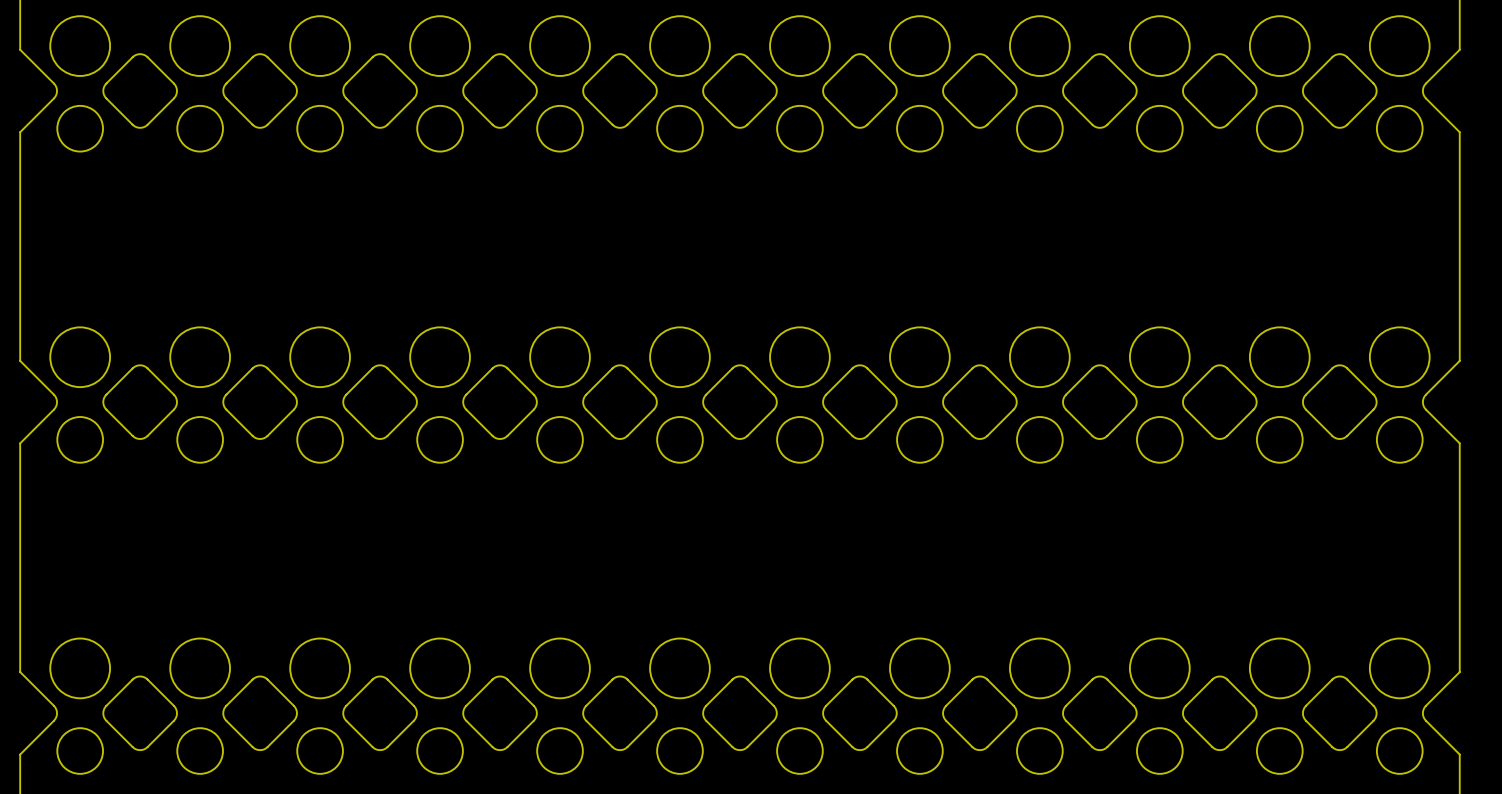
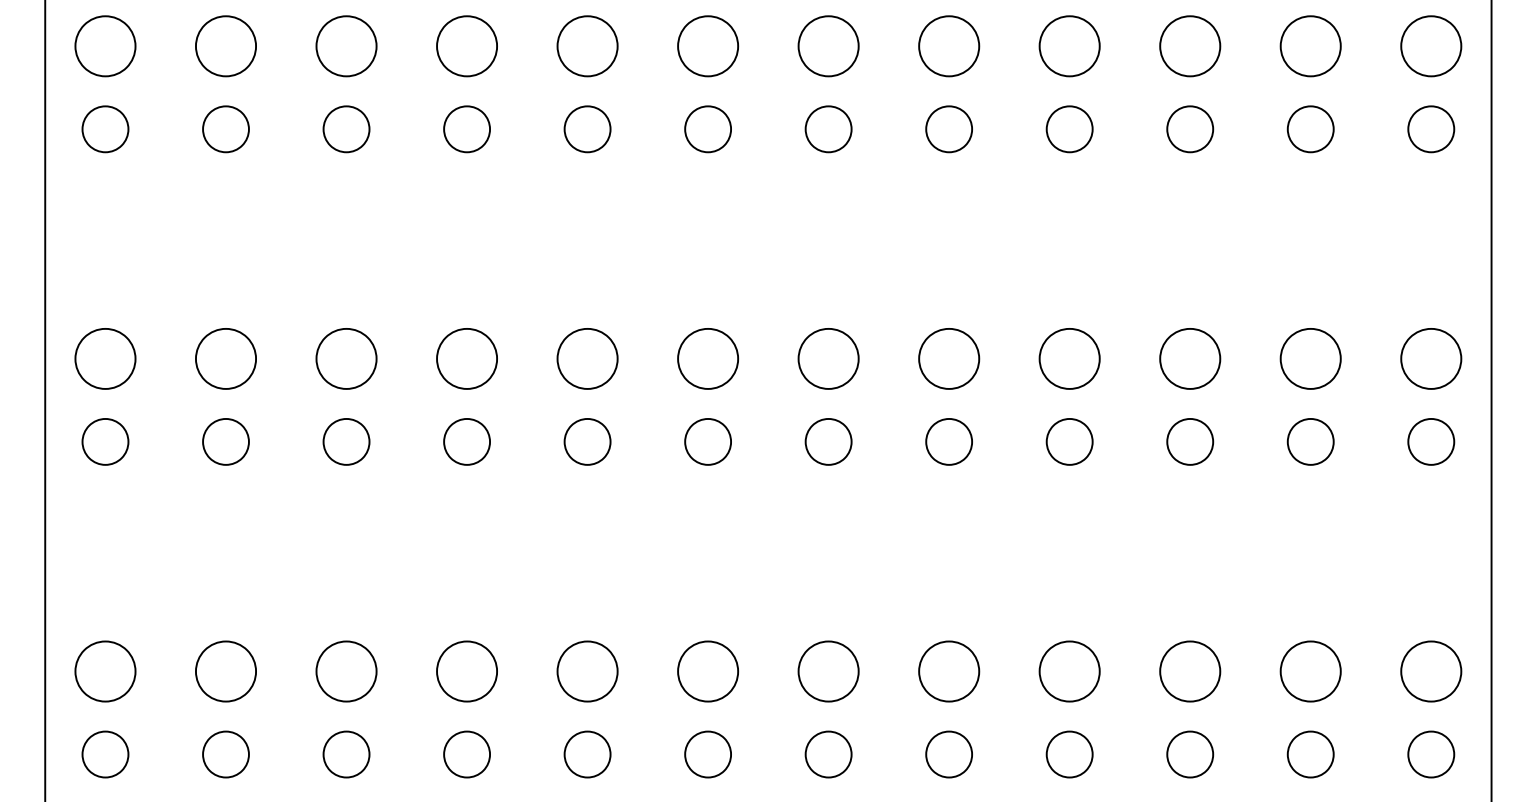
board edge: (20, 49) (53, 83) (57, 90) (53, 98) (20, 132) -> (45, 49) (45, 132)
board edge: (1459, 49) (1426, 83) (1422, 90) (1426, 98) (1459, 132) -> (1491, 49) (1491, 132)
board edge: (147, 57) (174, 84) (176, 92) (173, 98) (147, 124) (138, 127) (132, 124) (106, 98) (103, 89) (106, 83) (133, 56) (141, 54) (147, 57) -> none
board edge: (267, 57) (294, 84) (296, 92) (293, 98) (267, 124) (258, 127) (252, 124) (226, 98) (223, 89) (226, 83) (253, 56) (261, 54) (267, 57) -> none
board edge: (387, 57) (414, 84) (416, 92) (413, 98) (387, 124) (378, 127) (372, 124) (346, 98) (343, 89) (346, 83) (373, 56) (381, 54) (387, 57) -> none
board edge: (507, 57) (534, 84) (536, 92) (533, 98) (507, 124) (498, 127) (492, 124) (466, 98) (463, 89) (466, 83) (493, 56) (501, 54) (507, 57) -> none
board edge: (627, 57) (654, 84) (656, 92) (653, 98) (627, 124) (618, 127) (612, 124) (586, 98) (583, 89) (586, 83) (613, 56) (621, 54) (627, 57) -> none
board edge: (747, 57) (774, 84) (776, 92) (773, 98) (747, 124) (738, 127) (732, 124) (706, 98) (703, 89) (706, 83) (733, 56) (741, 54) (747, 57) -> none
board edge: (867, 57) (894, 84) (896, 92) (893, 98) (867, 124) (858, 127) (852, 124) (826, 98) (823, 89) (826, 83) (853, 56) (861, 54) (867, 57) -> none
board edge: (987, 57) (1014, 84) (1016, 92) (1013, 98) (987, 124) (978, 127) (972, 124) (946, 98) (943, 89) (946, 83) (973, 56) (981, 54) (987, 57) -> none
board edge: (1107, 57) (1134, 84) (1136, 92) (1133, 98) (1107, 124) (1098, 127) (1092, 124) (1066, 98) (1063, 89) (1066, 83) (1093, 56) (1101, 54) (1107, 57) -> none
board edge: (1227, 57) (1254, 84) (1256, 92) (1253, 98) (1227, 124) (1218, 127) (1212, 124) (1186, 98) (1183, 89) (1186, 83) (1213, 56) (1221, 54) (1227, 57) -> none
board edge: (1347, 57) (1374, 84) (1376, 92) (1373, 98) (1347, 124) (1338, 127) (1332, 124) (1306, 98) (1303, 89) (1306, 83) (1333, 56) (1341, 54) (1347, 57) -> none
board edge: (20, 360) (53, 394) (57, 402) (53, 409) (20, 443) -> (45, 362) (45, 445)
board edge: (1459, 360) (1426, 394) (1422, 402) (1426, 409) (1459, 443) -> (1491, 362) (1491, 445)
board edge: (147, 368) (174, 395) (176, 403) (173, 409) (147, 435) (138, 438) (132, 435) (106, 409) (103, 400) (106, 394) (133, 367) (141, 365) (147, 368) -> none
board edge: (267, 368) (294, 395) (296, 403) (293, 409) (267, 435) (258, 438) (252, 435) (226, 409) (223, 400) (226, 394) (253, 367) (261, 365) (267, 368) -> none
board edge: (387, 368) (414, 395) (416, 403) (413, 409) (387, 435) (378, 438) (372, 435) (346, 409) (343, 400) (346, 394) (373, 367) (381, 365) (387, 368) -> none
board edge: (507, 368) (534, 395) (536, 403) (533, 409) (507, 435) (498, 438) (492, 435) (466, 409) (463, 400) (466, 394) (493, 367) (501, 365) (507, 368) -> none
board edge: (627, 368) (654, 395) (656, 403) (653, 409) (627, 435) (618, 438) (612, 435) (586, 409) (583, 400) (586, 394) (613, 367) (621, 365) (627, 368) -> none
board edge: (747, 368) (774, 395) (776, 403) (773, 409) (747, 435) (738, 438) (732, 435) (706, 409) (703, 400) (706, 394) (733, 367) (741, 365) (747, 368) -> none
board edge: (867, 368) (894, 395) (896, 403) (893, 409) (867, 435) (858, 438) (852, 435) (826, 409) (823, 400) (826, 394) (853, 367) (861, 365) (867, 368) -> none
board edge: (987, 368) (1014, 395) (1016, 403) (1013, 409) (987, 435) (978, 438) (972, 435) (946, 409) (943, 400) (946, 394) (973, 367) (981, 365) (987, 368) -> none
board edge: (1107, 368) (1134, 395) (1136, 403) (1133, 409) (1107, 435) (1098, 438) (1092, 435) (1066, 409) (1063, 400) (1066, 394) (1093, 367) (1101, 365) (1107, 368) -> none
board edge: (1227, 368) (1254, 395) (1256, 403) (1253, 409) (1227, 435) (1218, 438) (1212, 435) (1186, 409) (1183, 400) (1186, 394) (1213, 367) (1221, 365) (1227, 368) -> none
board edge: (1347, 368) (1374, 395) (1376, 403) (1373, 409) (1347, 435) (1338, 438) (1332, 435) (1306, 409) (1303, 400) (1306, 394) (1333, 367) (1341, 365) (1347, 368) -> none
board edge: (20, 672) (53, 705) (57, 713) (53, 720) (20, 754) -> (45, 675) (45, 758)
board edge: (1459, 672) (1426, 705) (1422, 713) (1426, 720) (1459, 754) -> (1491, 675) (1491, 758)
board edge: (147, 679) (174, 706) (176, 714) (173, 720) (147, 747) (138, 750) (132, 747) (106, 720) (103, 711) (106, 705) (133, 678) (141, 676) (147, 679) -> none
board edge: (267, 679) (294, 706) (296, 714) (293, 720) (267, 747) (258, 750) (252, 747) (226, 720) (223, 711) (226, 705) (253, 678) (261, 676) (267, 679) -> none
board edge: (387, 679) (414, 706) (416, 714) (413, 720) (387, 747) (378, 750) (372, 747) (346, 720) (343, 711) (346, 705) (373, 678) (381, 676) (387, 679) -> none
board edge: (507, 679) (534, 706) (536, 714) (533, 720) (507, 747) (498, 750) (492, 747) (466, 720) (463, 711) (466, 705) (493, 678) (501, 676) (507, 679) -> none
board edge: (627, 679) (654, 706) (656, 714) (653, 720) (627, 747) (618, 750) (612, 747) (586, 720) (583, 711) (586, 705) (613, 678) (621, 676) (627, 679) -> none
board edge: (747, 679) (774, 706) (776, 714) (773, 720) (747, 747) (738, 750) (732, 747) (706, 720) (703, 711) (706, 705) (733, 678) (741, 676) (747, 679) -> none
board edge: (867, 679) (894, 706) (896, 714) (893, 720) (867, 747) (858, 750) (852, 747) (826, 720) (823, 711) (826, 705) (853, 678) (861, 676) (867, 679) -> none
board edge: (987, 679) (1014, 706) (1016, 714) (1013, 720) (987, 747) (978, 750) (972, 747) (946, 720) (943, 711) (946, 705) (973, 678) (981, 676) (987, 679) -> none
board edge: (1107, 679) (1134, 706) (1136, 714) (1133, 720) (1107, 747) (1098, 750) (1092, 747) (1066, 720) (1063, 711) (1066, 705) (1093, 678) (1101, 676) (1107, 679) -> none
board edge: (1227, 679) (1254, 706) (1256, 714) (1253, 720) (1227, 747) (1218, 750) (1212, 747) (1186, 720) (1183, 711) (1186, 705) (1213, 678) (1221, 676) (1227, 679) -> none
board edge: (1347, 679) (1374, 706) (1376, 714) (1373, 720) (1347, 747) (1338, 750) (1332, 747) (1306, 720) (1303, 711) (1306, 705) (1333, 678) (1341, 676) (1347, 679) -> none

